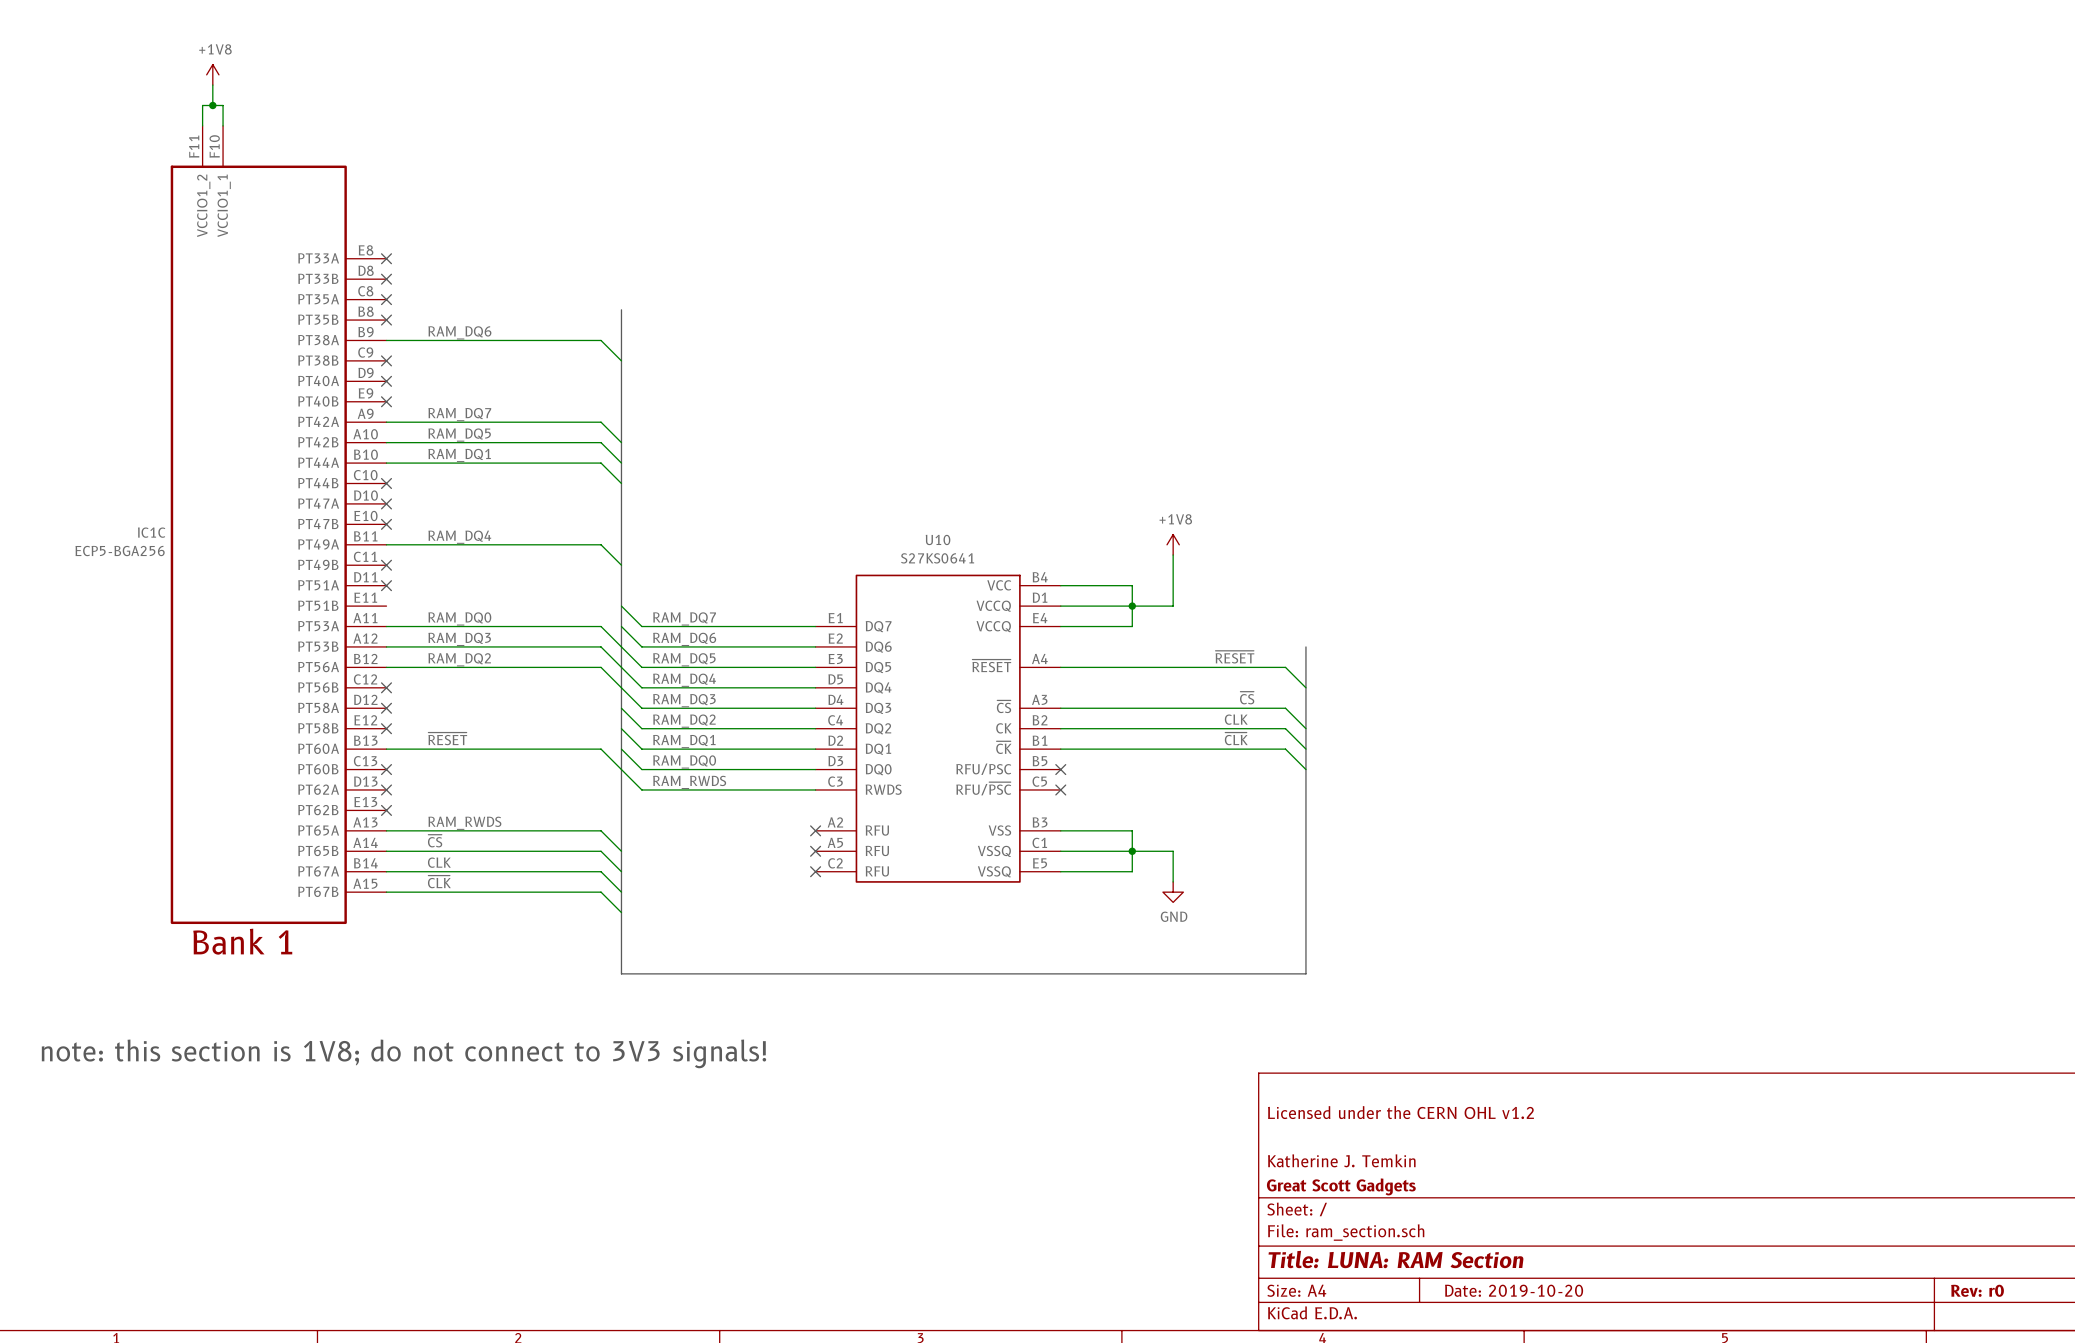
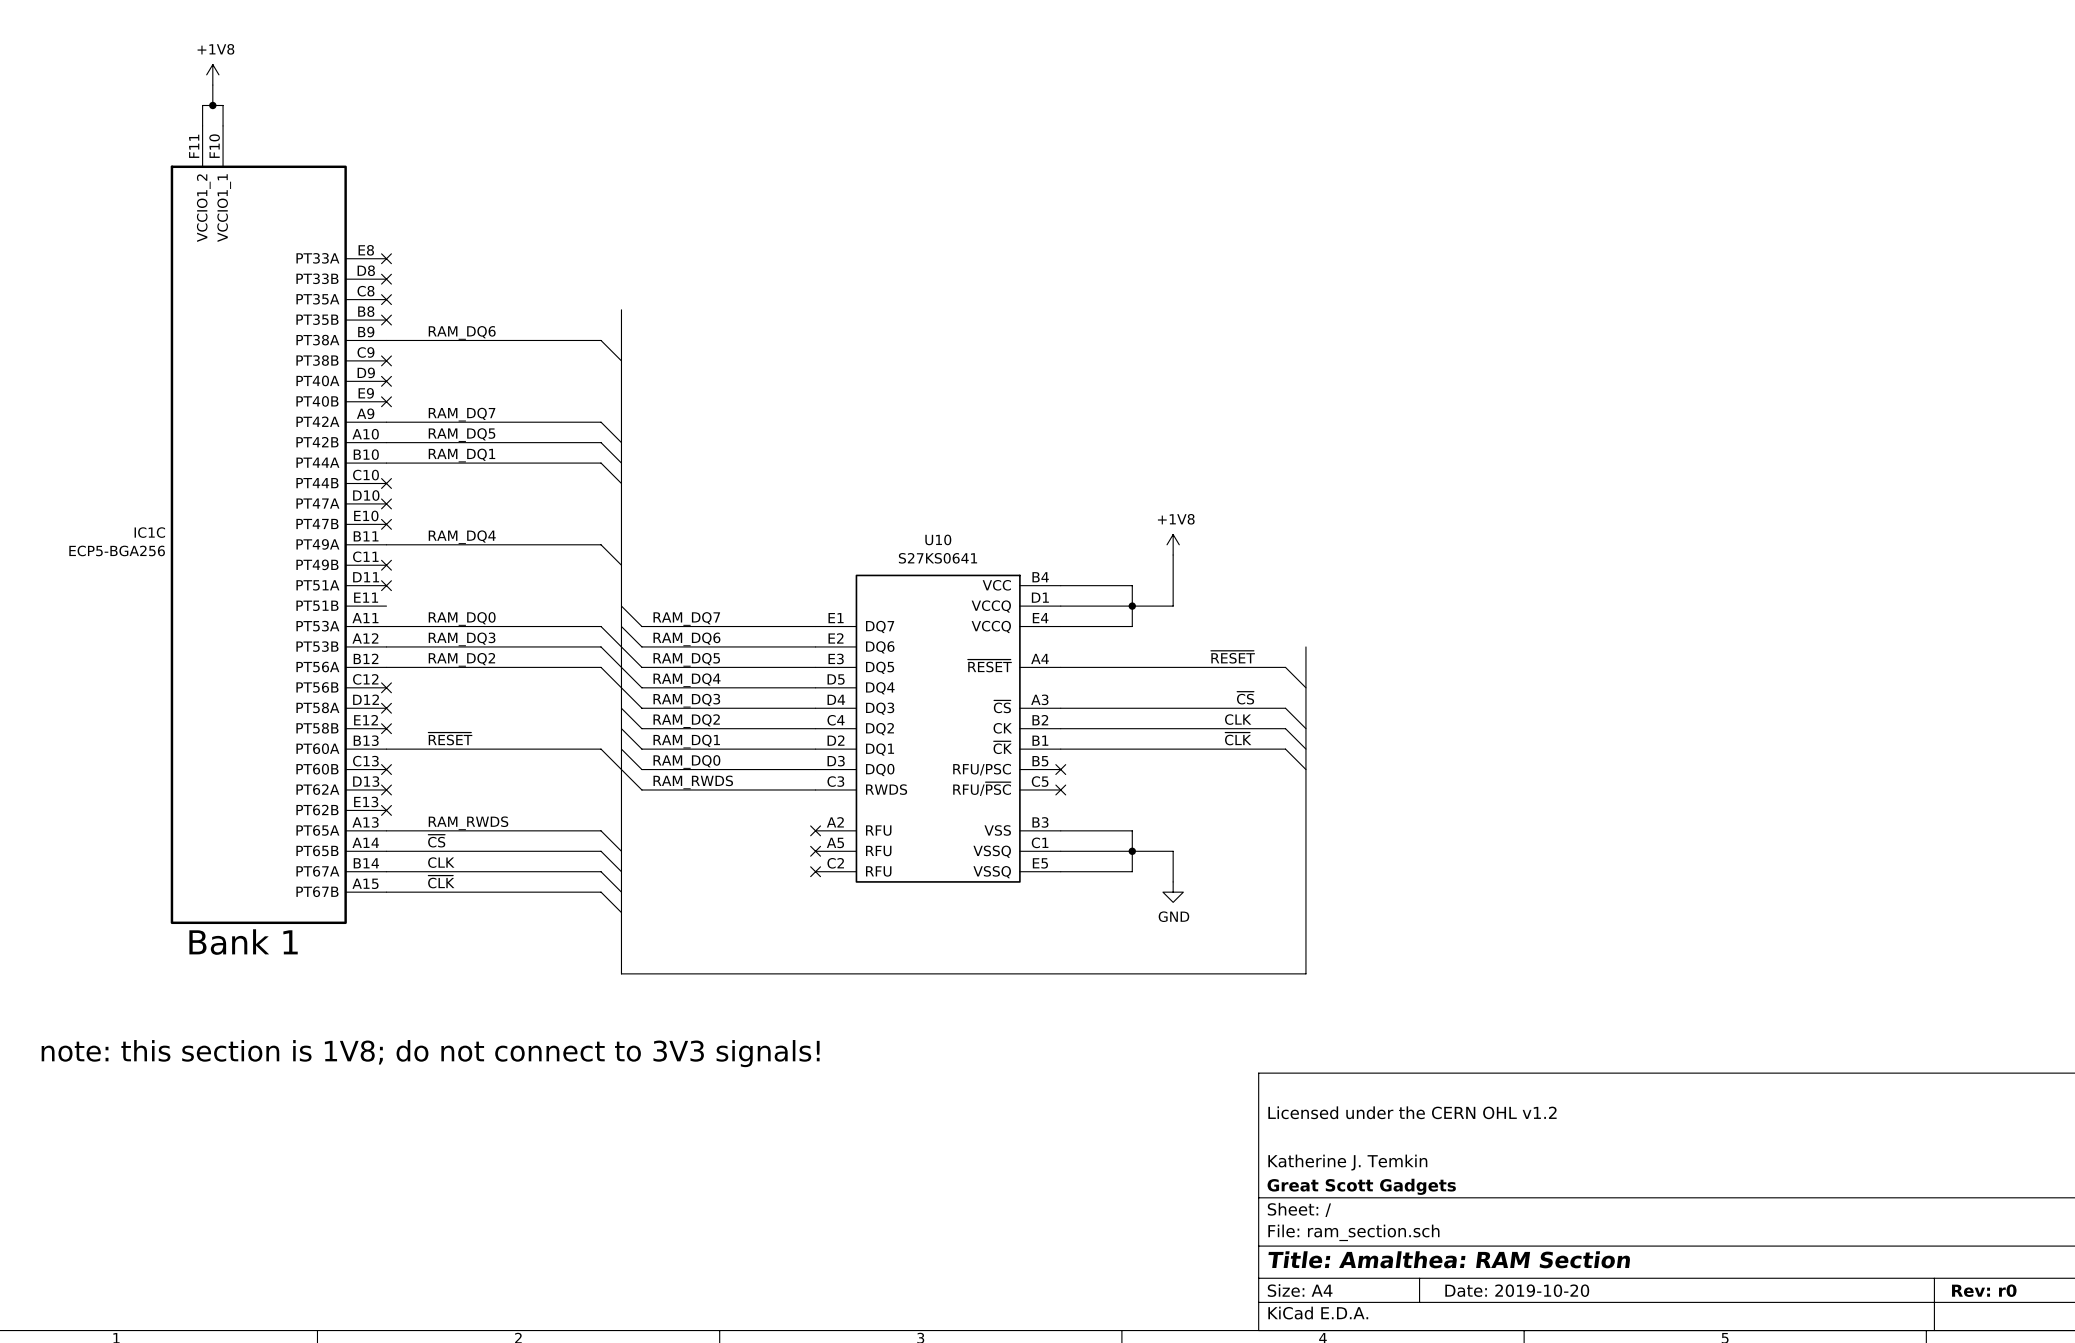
title block: Title: LUNA: RAM Section (1395, 1259) -> Title: Amalthea: RAM Section (1449, 1259)

